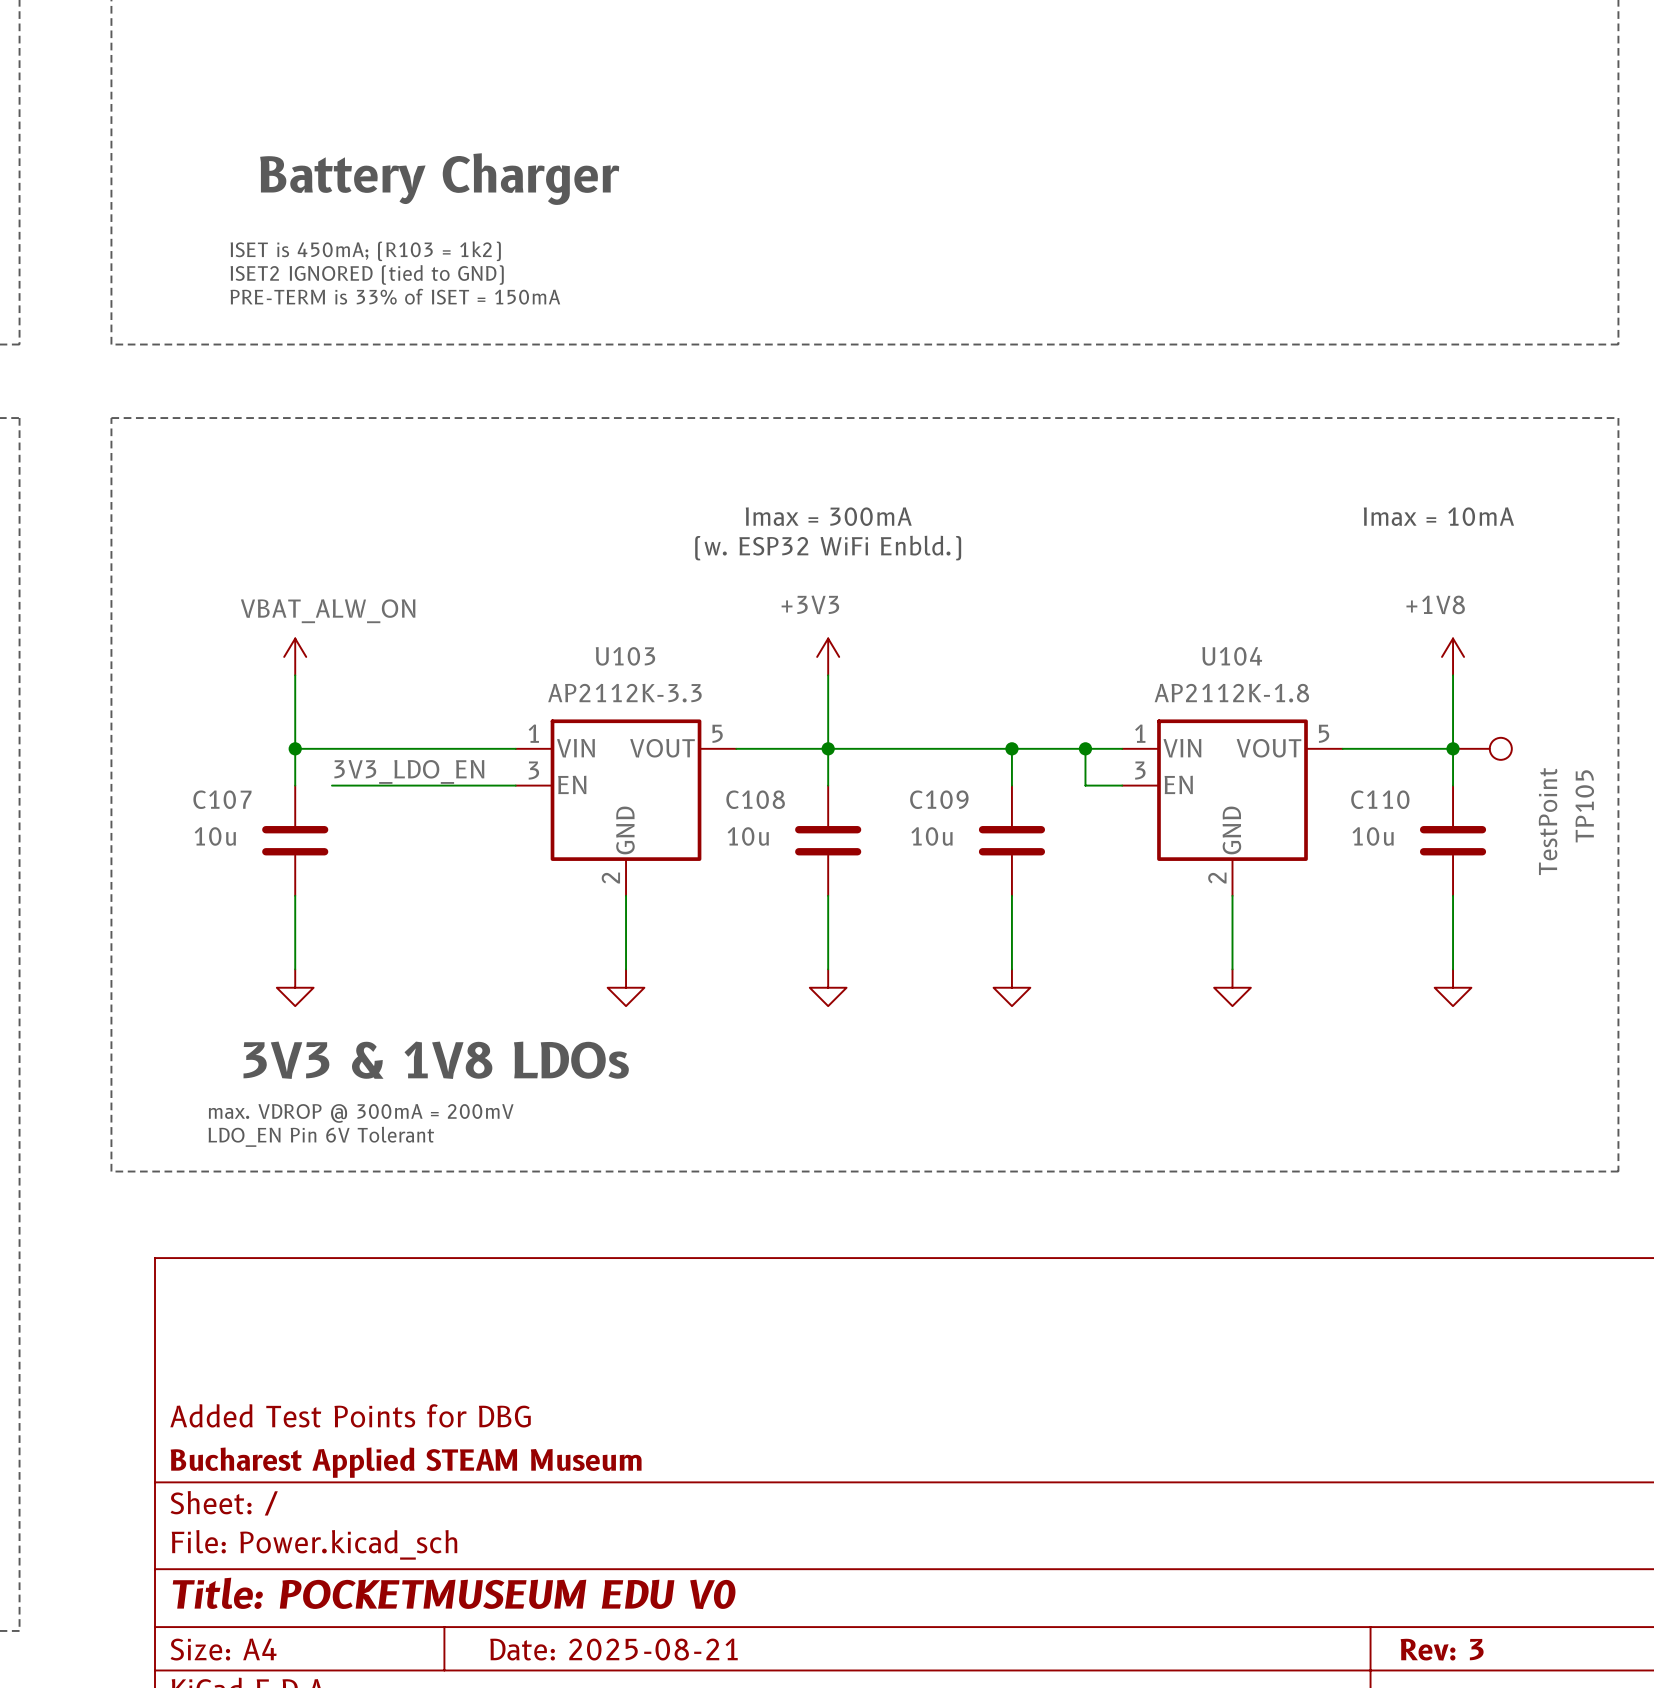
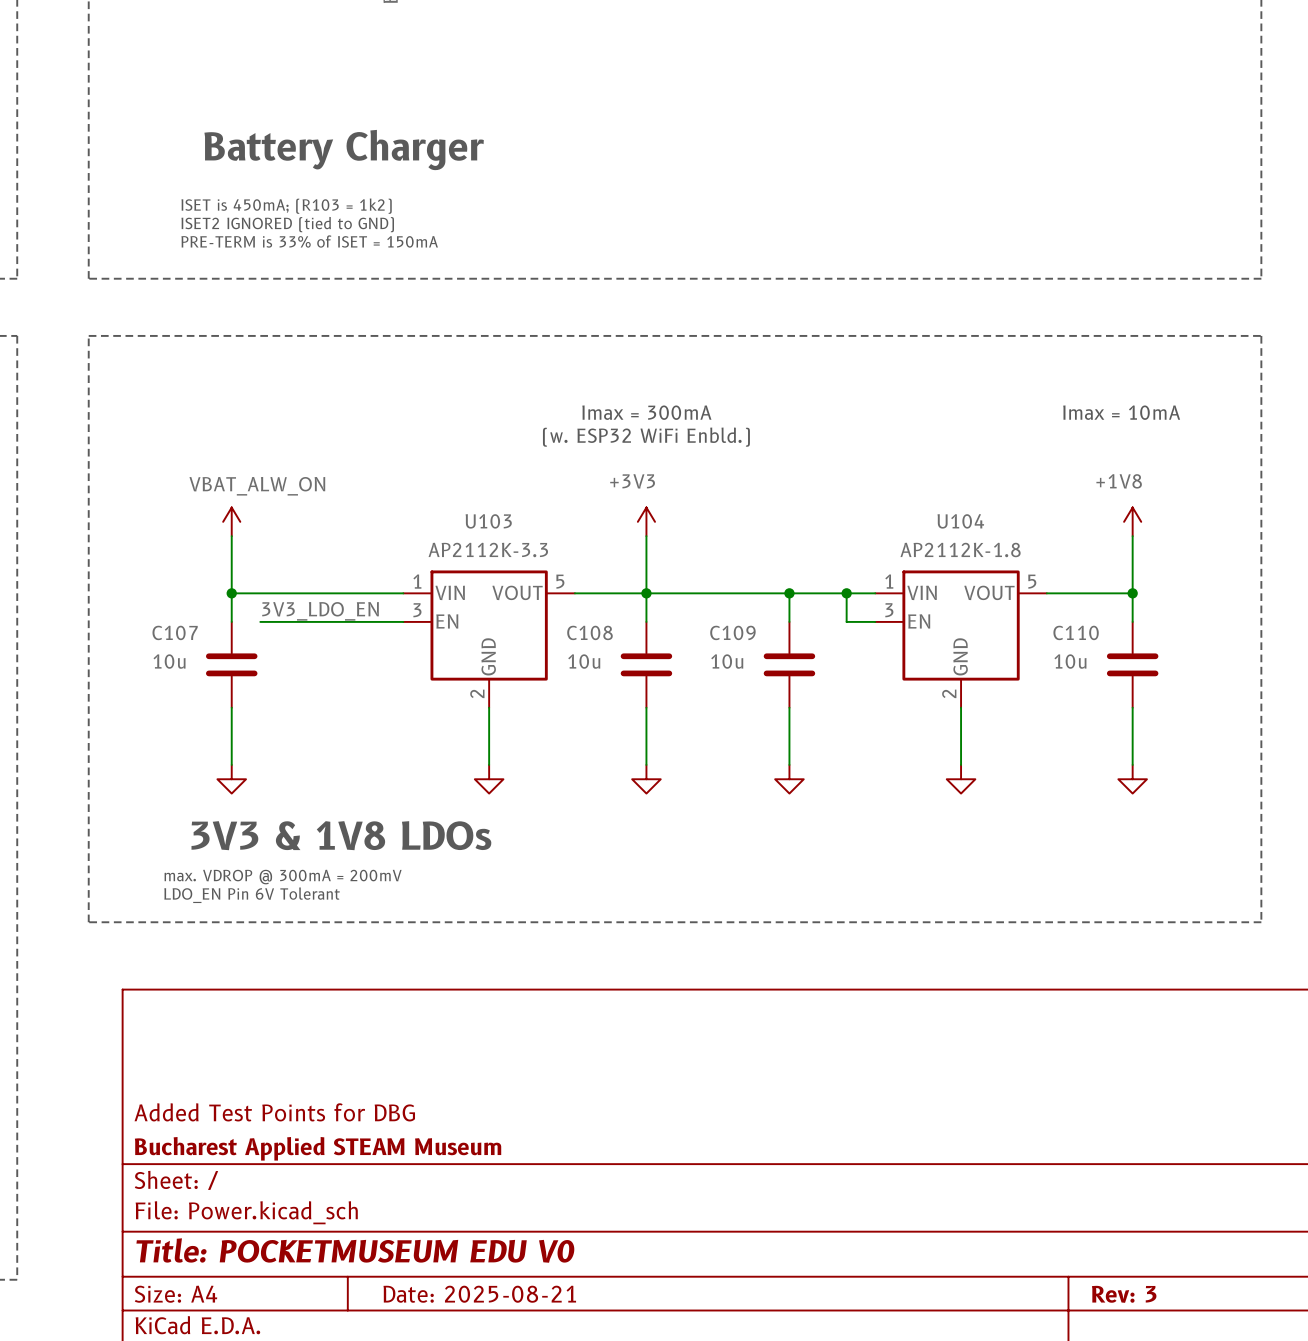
TP105: TestPoint (1482, 748) -> none

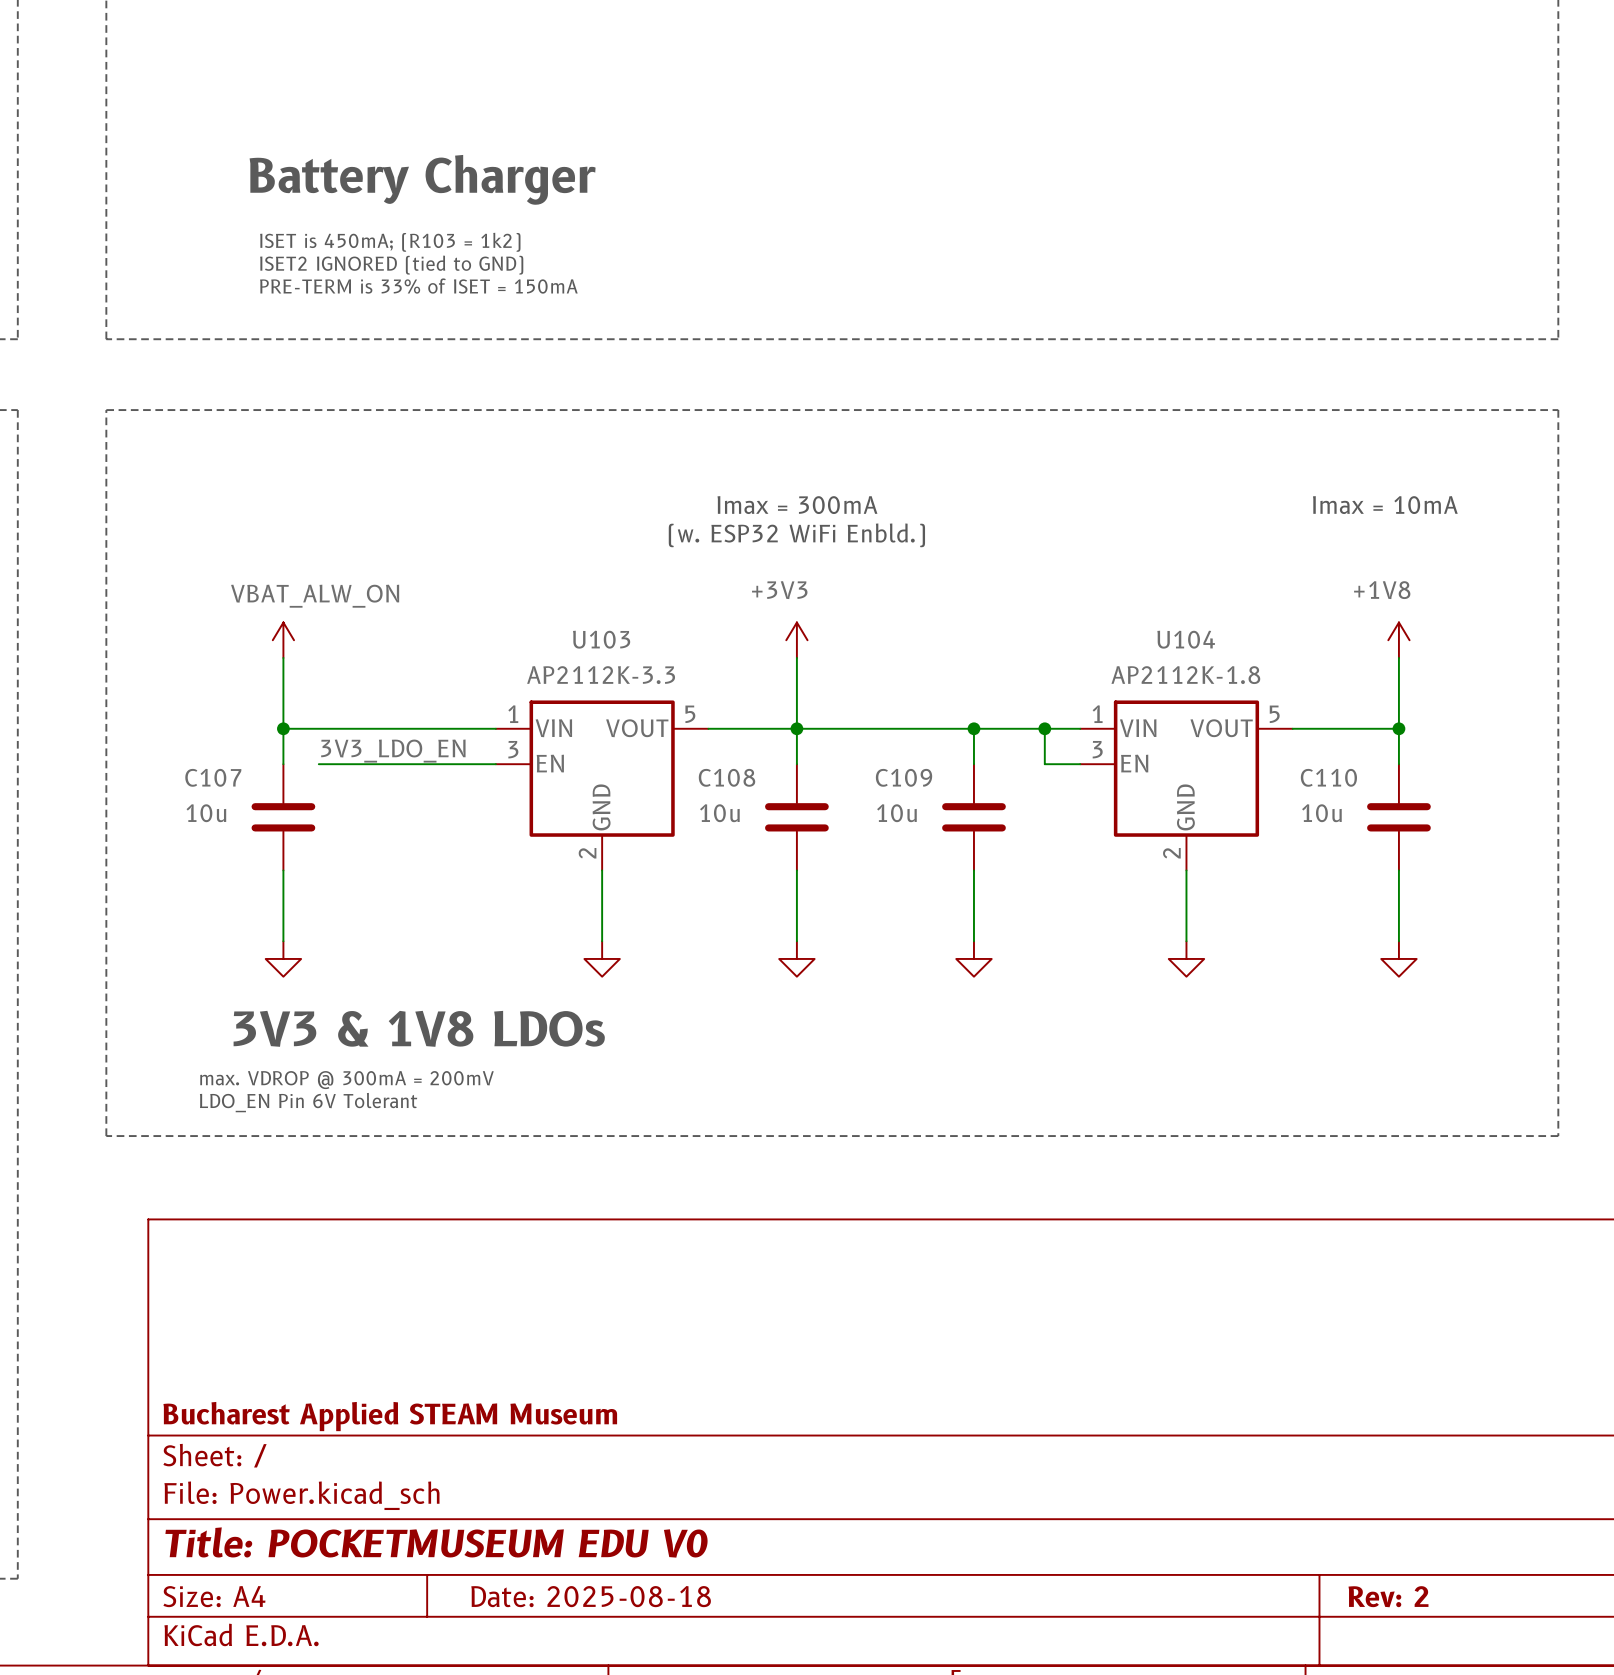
text position: ISET is 450mA; (R103 = 1k2) (286, 206) -> ISET is 450mA; (R103 = 1k2) (390, 242)
text position: ISET2 IGNORED (tied to GND) (287, 224) -> ISET2 IGNORED (tied to GND) (391, 265)
text position: PRE-TERM is 33% of ISET = 150mA (309, 241) -> PRE-TERM is 33% of ISET = 150mA (418, 286)
title block: Added Test Points for DBG (274, 1112) -> none
title block: Date: 2025-08-21 (479, 1294) -> Date: 2025-08-18 (591, 1596)
title block: Rev: 3 (1124, 1294) -> Rev: 2 (1388, 1596)

